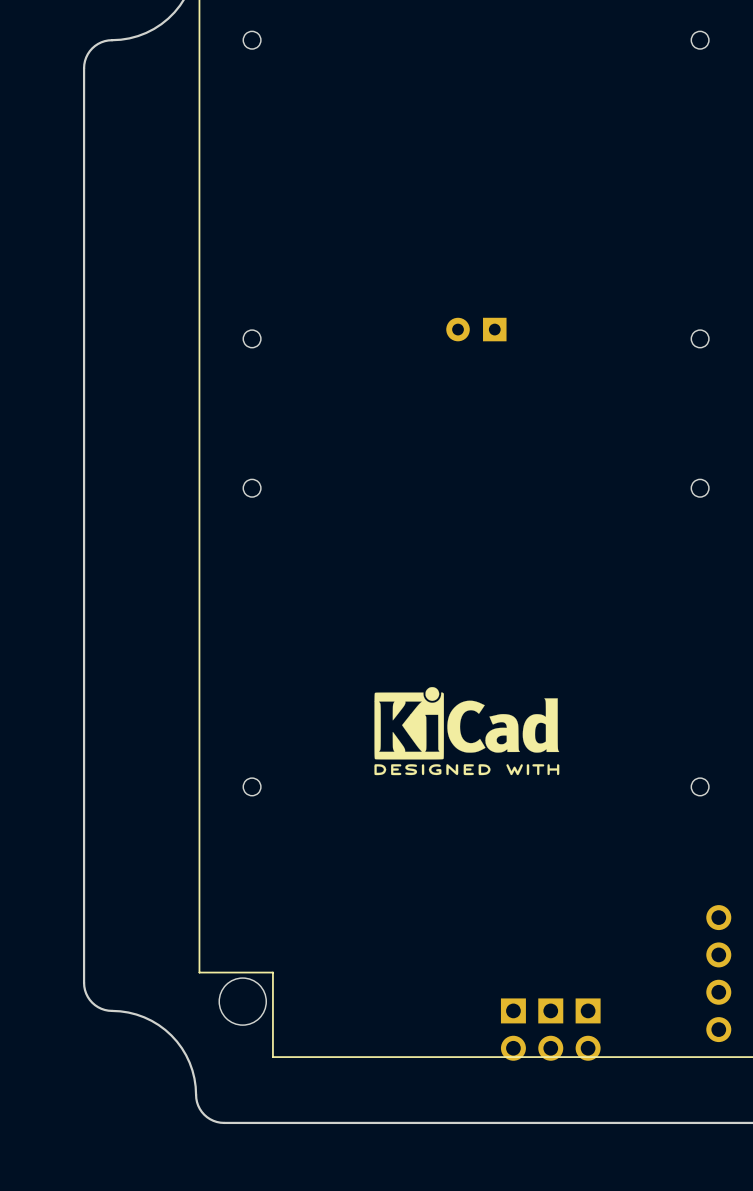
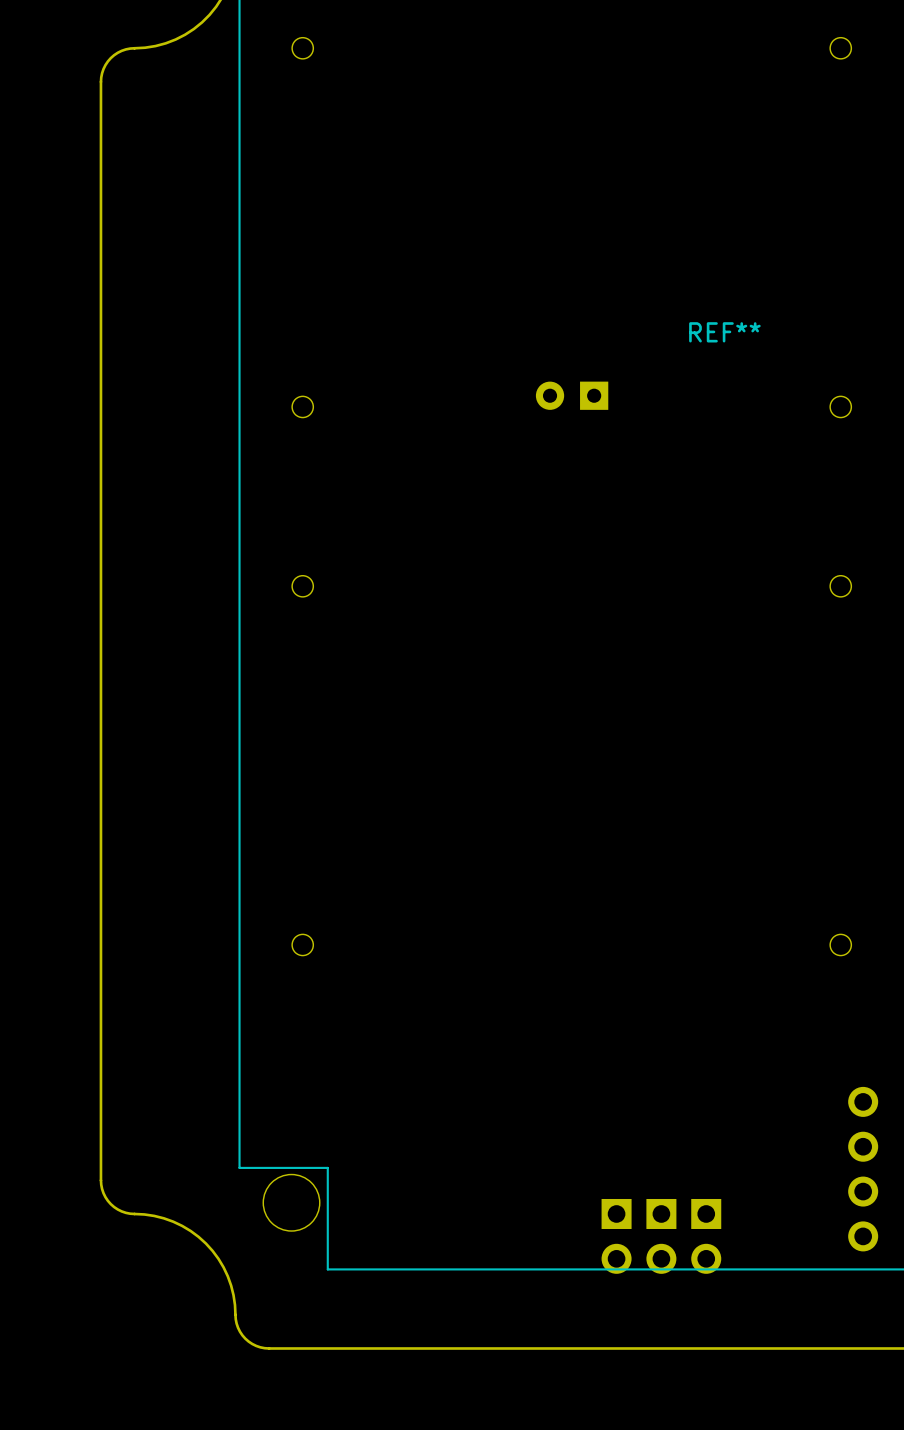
REF** name: none -> REF** (724, 332)
drawing: [374, 687, 560, 776] -> none

